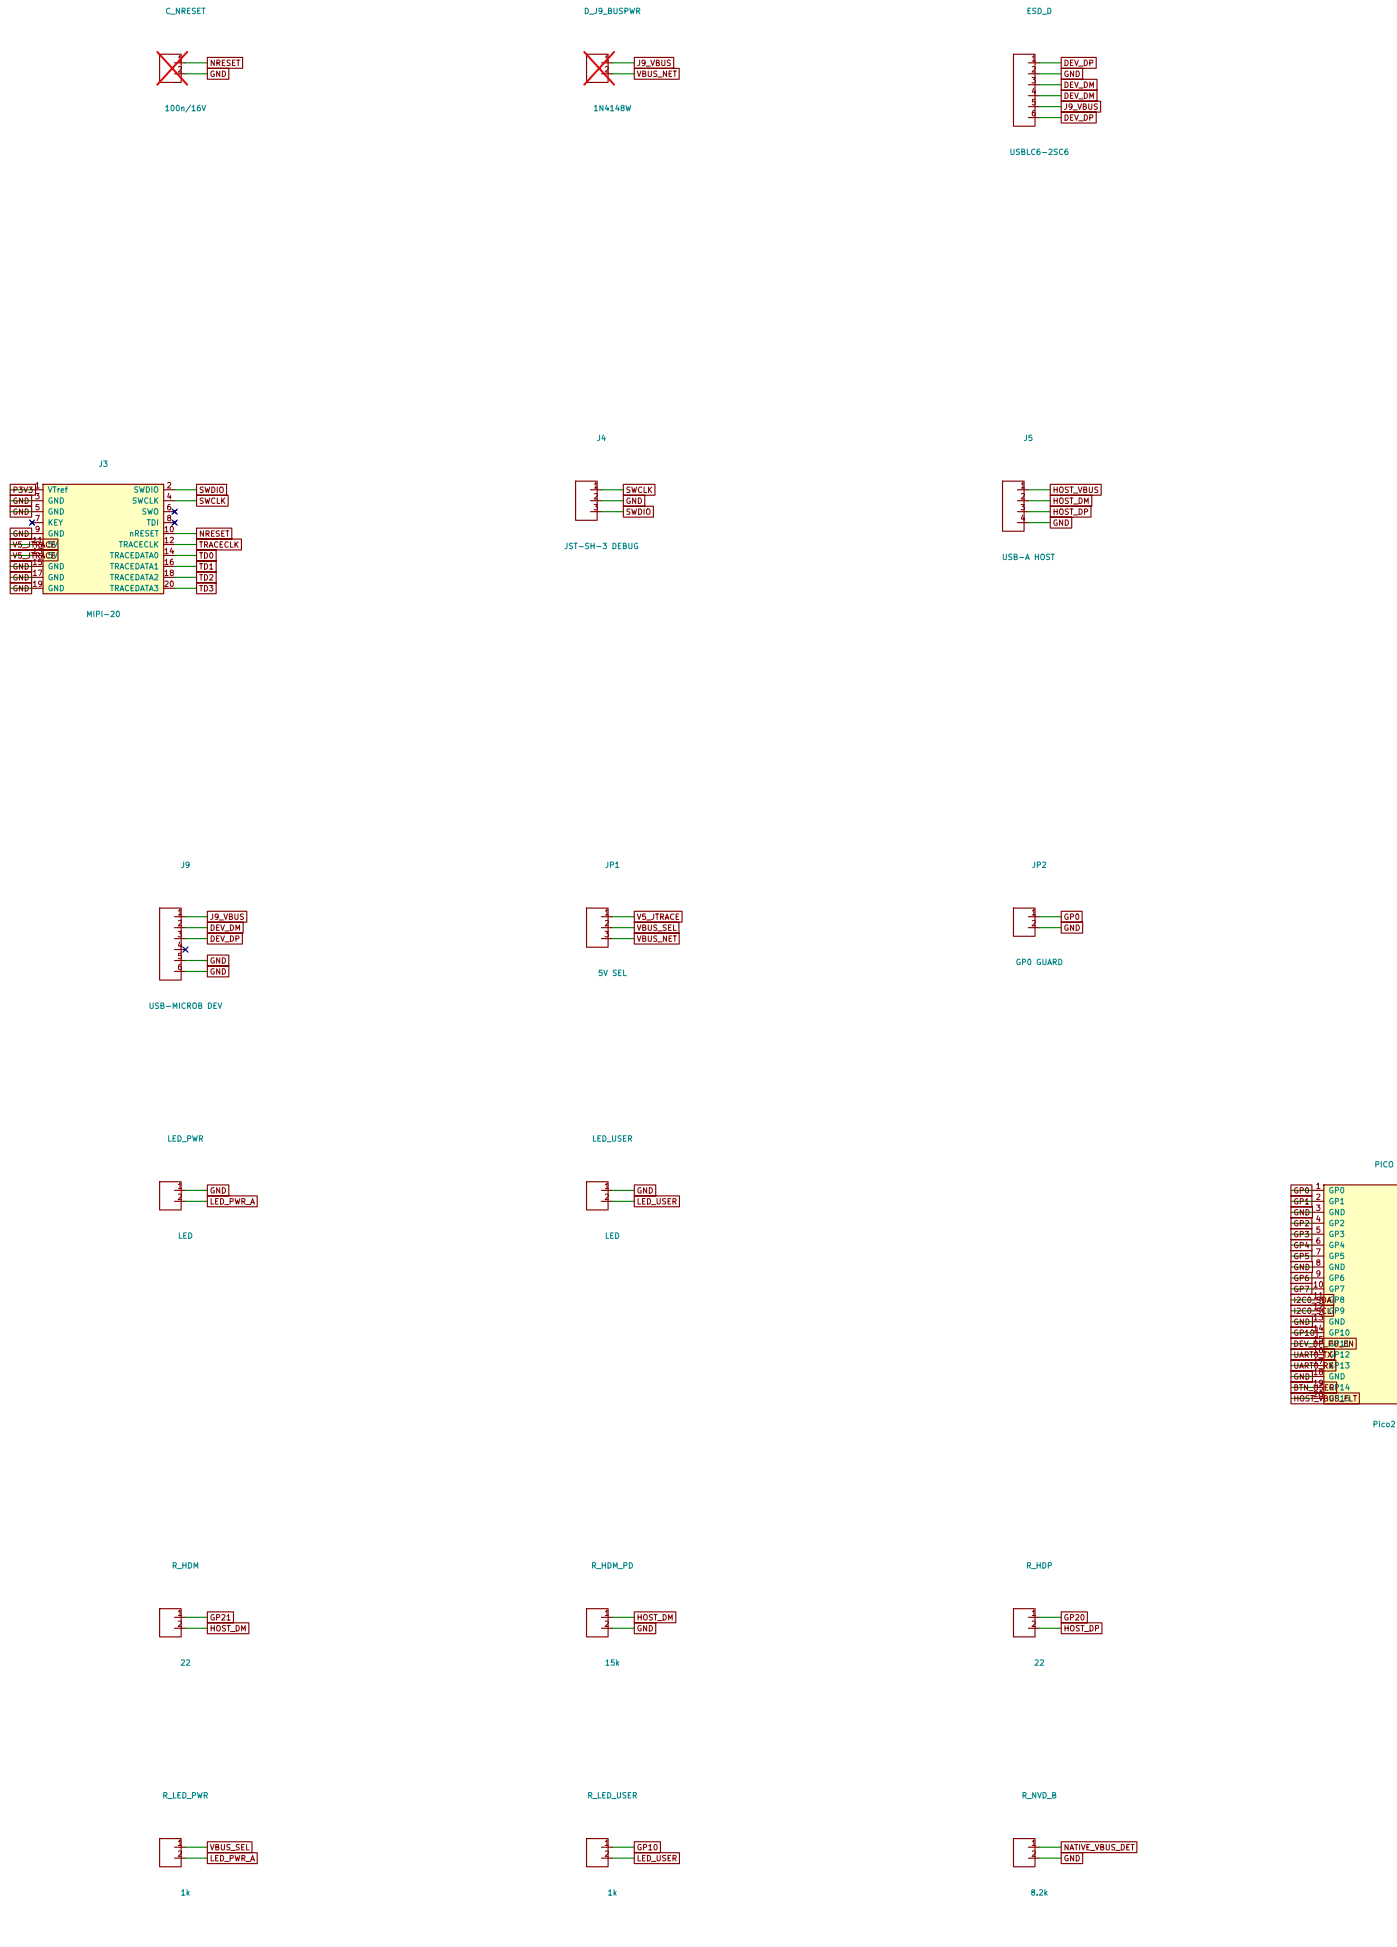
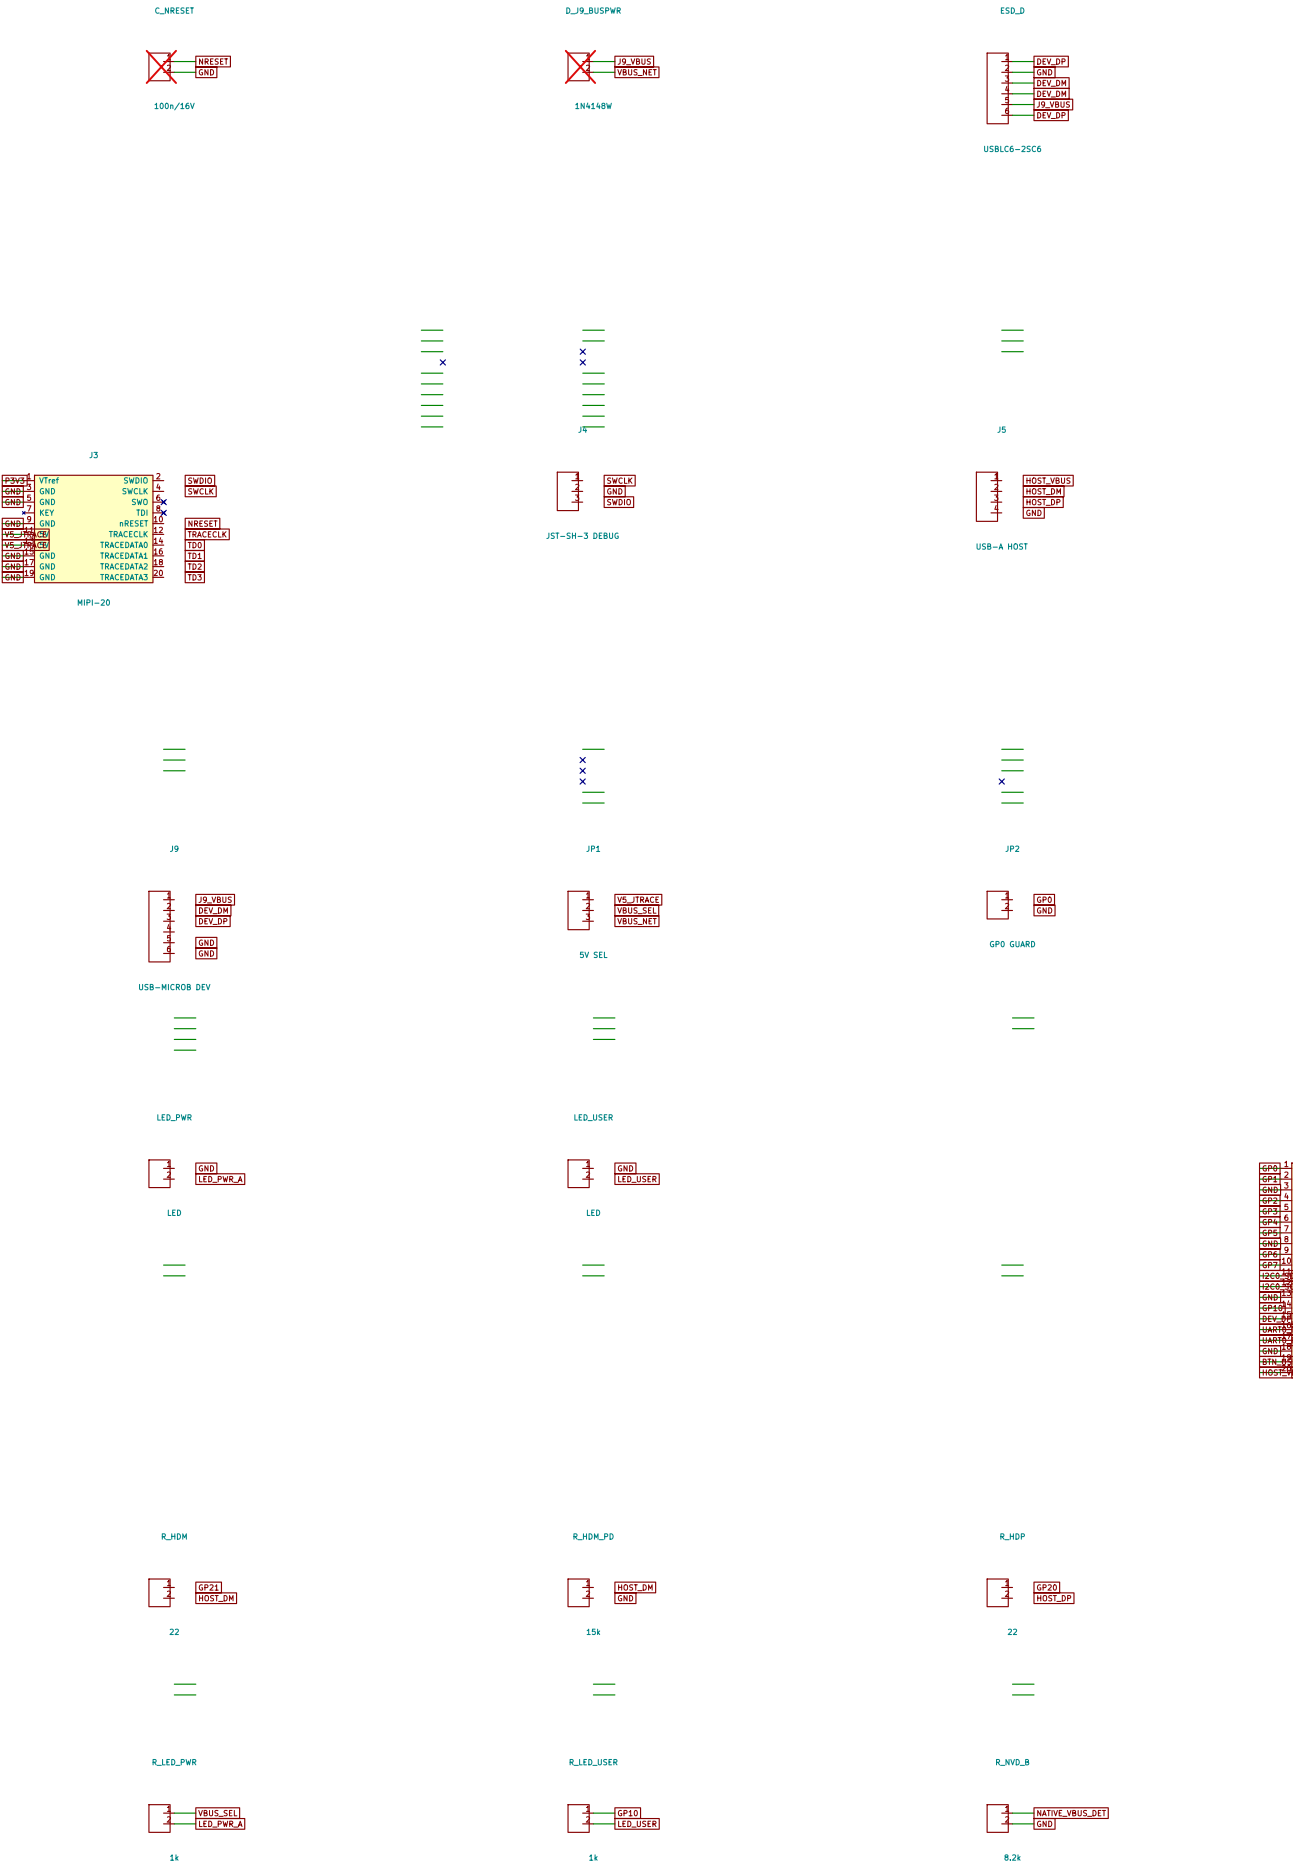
wire: none -> (421, 330) (442, 330)
wire: none -> (582, 330) (604, 330)
wire: none -> (1001, 330) (1023, 330)
wire: none -> (421, 340) (442, 340)
wire: none -> (582, 340) (604, 340)
wire: none -> (1001, 340) (1023, 340)
wire: none -> (421, 351) (442, 351)
no-connect mark: none -> (582, 351)
wire: none -> (1001, 351) (1023, 351)
no-connect mark: none -> (442, 362)
no-connect mark: none -> (582, 362)
wire: none -> (421, 373) (442, 373)
wire: none -> (582, 373) (604, 373)
wire: none -> (421, 383) (442, 383)
wire: none -> (582, 383) (604, 383)
wire: none -> (421, 394) (442, 394)
wire: none -> (582, 394) (604, 394)
wire: none -> (421, 405) (442, 405)
wire: none -> (421, 416) (442, 416)
wire: none -> (421, 426) (442, 426)
wire: (174, 489) (196, 489) -> none
wire: (601, 489) (623, 489) -> (582, 405) (604, 405)
wire: (1028, 489) (1050, 489) -> none
wire: (174, 500) (196, 500) -> none
wire: (601, 500) (623, 500) -> (582, 416) (604, 416)
wire: (1028, 500) (1050, 500) -> none
wire: (601, 511) (623, 511) -> (582, 426) (604, 426)
wire: (1028, 511) (1050, 511) -> none
no-connect mark: (32, 522) -> none
wire: (1028, 522) (1050, 522) -> none
wire: (174, 533) (196, 533) -> none
wire: (174, 544) (196, 544) -> none
wire: (174, 555) (196, 555) -> none
wire: (174, 566) (196, 566) -> none
wire: (174, 577) (196, 577) -> none
wire: (174, 588) (196, 588) -> none
wire: none -> (163, 749) (185, 749)
wire: none -> (582, 749) (604, 749)
wire: none -> (1001, 749) (1023, 749)
wire: none -> (163, 760) (185, 760)
no-connect mark: none -> (582, 760)
wire: none -> (1001, 760) (1023, 760)
wire: none -> (163, 770) (185, 770)
no-connect mark: none -> (582, 770)
wire: none -> (1001, 770) (1023, 770)
no-connect mark: none -> (582, 781)
no-connect mark: none -> (1001, 781)
wire: none -> (582, 792) (604, 792)
wire: none -> (1001, 792) (1023, 792)
wire: (185, 916) (207, 916) -> none
wire: (612, 916) (634, 916) -> (582, 803) (604, 803)
wire: (1039, 916) (1061, 916) -> (1001, 803) (1023, 803)
wire: (185, 927) (207, 927) -> none
wire: (612, 927) (634, 927) -> none
wire: (1039, 927) (1061, 927) -> none
wire: (185, 938) (207, 938) -> (174, 1017) (195, 1017)
wire: (612, 938) (634, 938) -> (593, 1017) (614, 1017)
no-connect mark: (185, 949) -> none
wire: (185, 960) (207, 960) -> (174, 1039) (195, 1039)
wire: (185, 971) (207, 971) -> (174, 1050) (195, 1050)
wire: none -> (1012, 1017) (1033, 1017)
wire: none -> (174, 1028) (195, 1028)
wire: none -> (593, 1028) (614, 1028)
wire: none -> (1012, 1028) (1033, 1028)
wire: none -> (593, 1039) (614, 1039)
wire: (185, 1190) (207, 1190) -> (163, 1265) (185, 1265)
wire: (612, 1190) (634, 1190) -> (582, 1265) (604, 1265)
wire: (185, 1201) (207, 1201) -> (163, 1275) (185, 1275)
wire: (612, 1201) (634, 1201) -> (582, 1275) (604, 1275)
wire: none -> (1001, 1265) (1023, 1265)
wire: none -> (1001, 1275) (1023, 1275)
wire: (185, 1617) (207, 1617) -> (174, 1684) (195, 1684)
wire: (612, 1617) (634, 1617) -> (593, 1684) (614, 1684)
wire: (1039, 1617) (1061, 1617) -> (1012, 1684) (1033, 1684)
wire: (185, 1628) (207, 1628) -> (174, 1694) (195, 1694)
wire: (612, 1628) (634, 1628) -> (593, 1694) (614, 1694)
wire: (1039, 1628) (1061, 1628) -> (1012, 1694) (1033, 1694)

